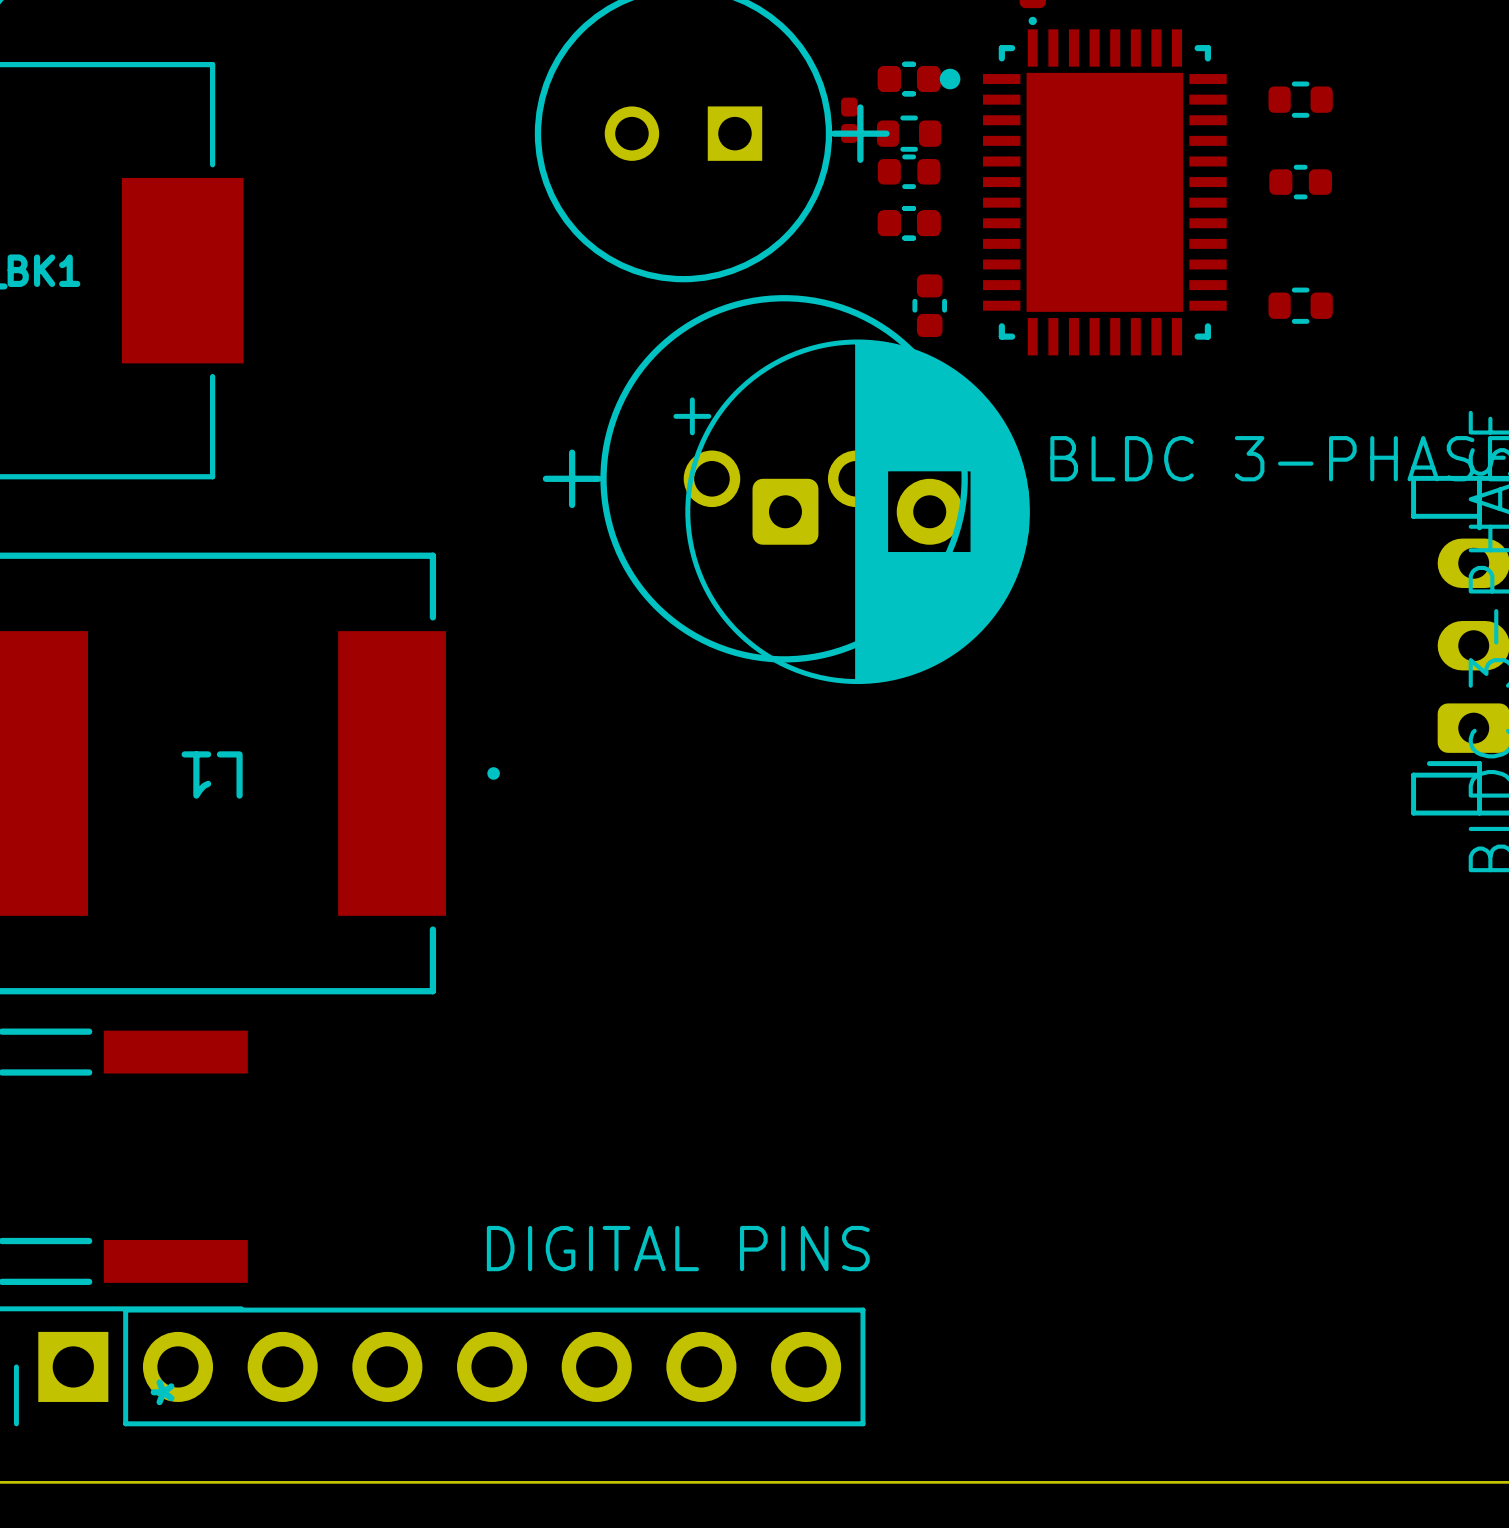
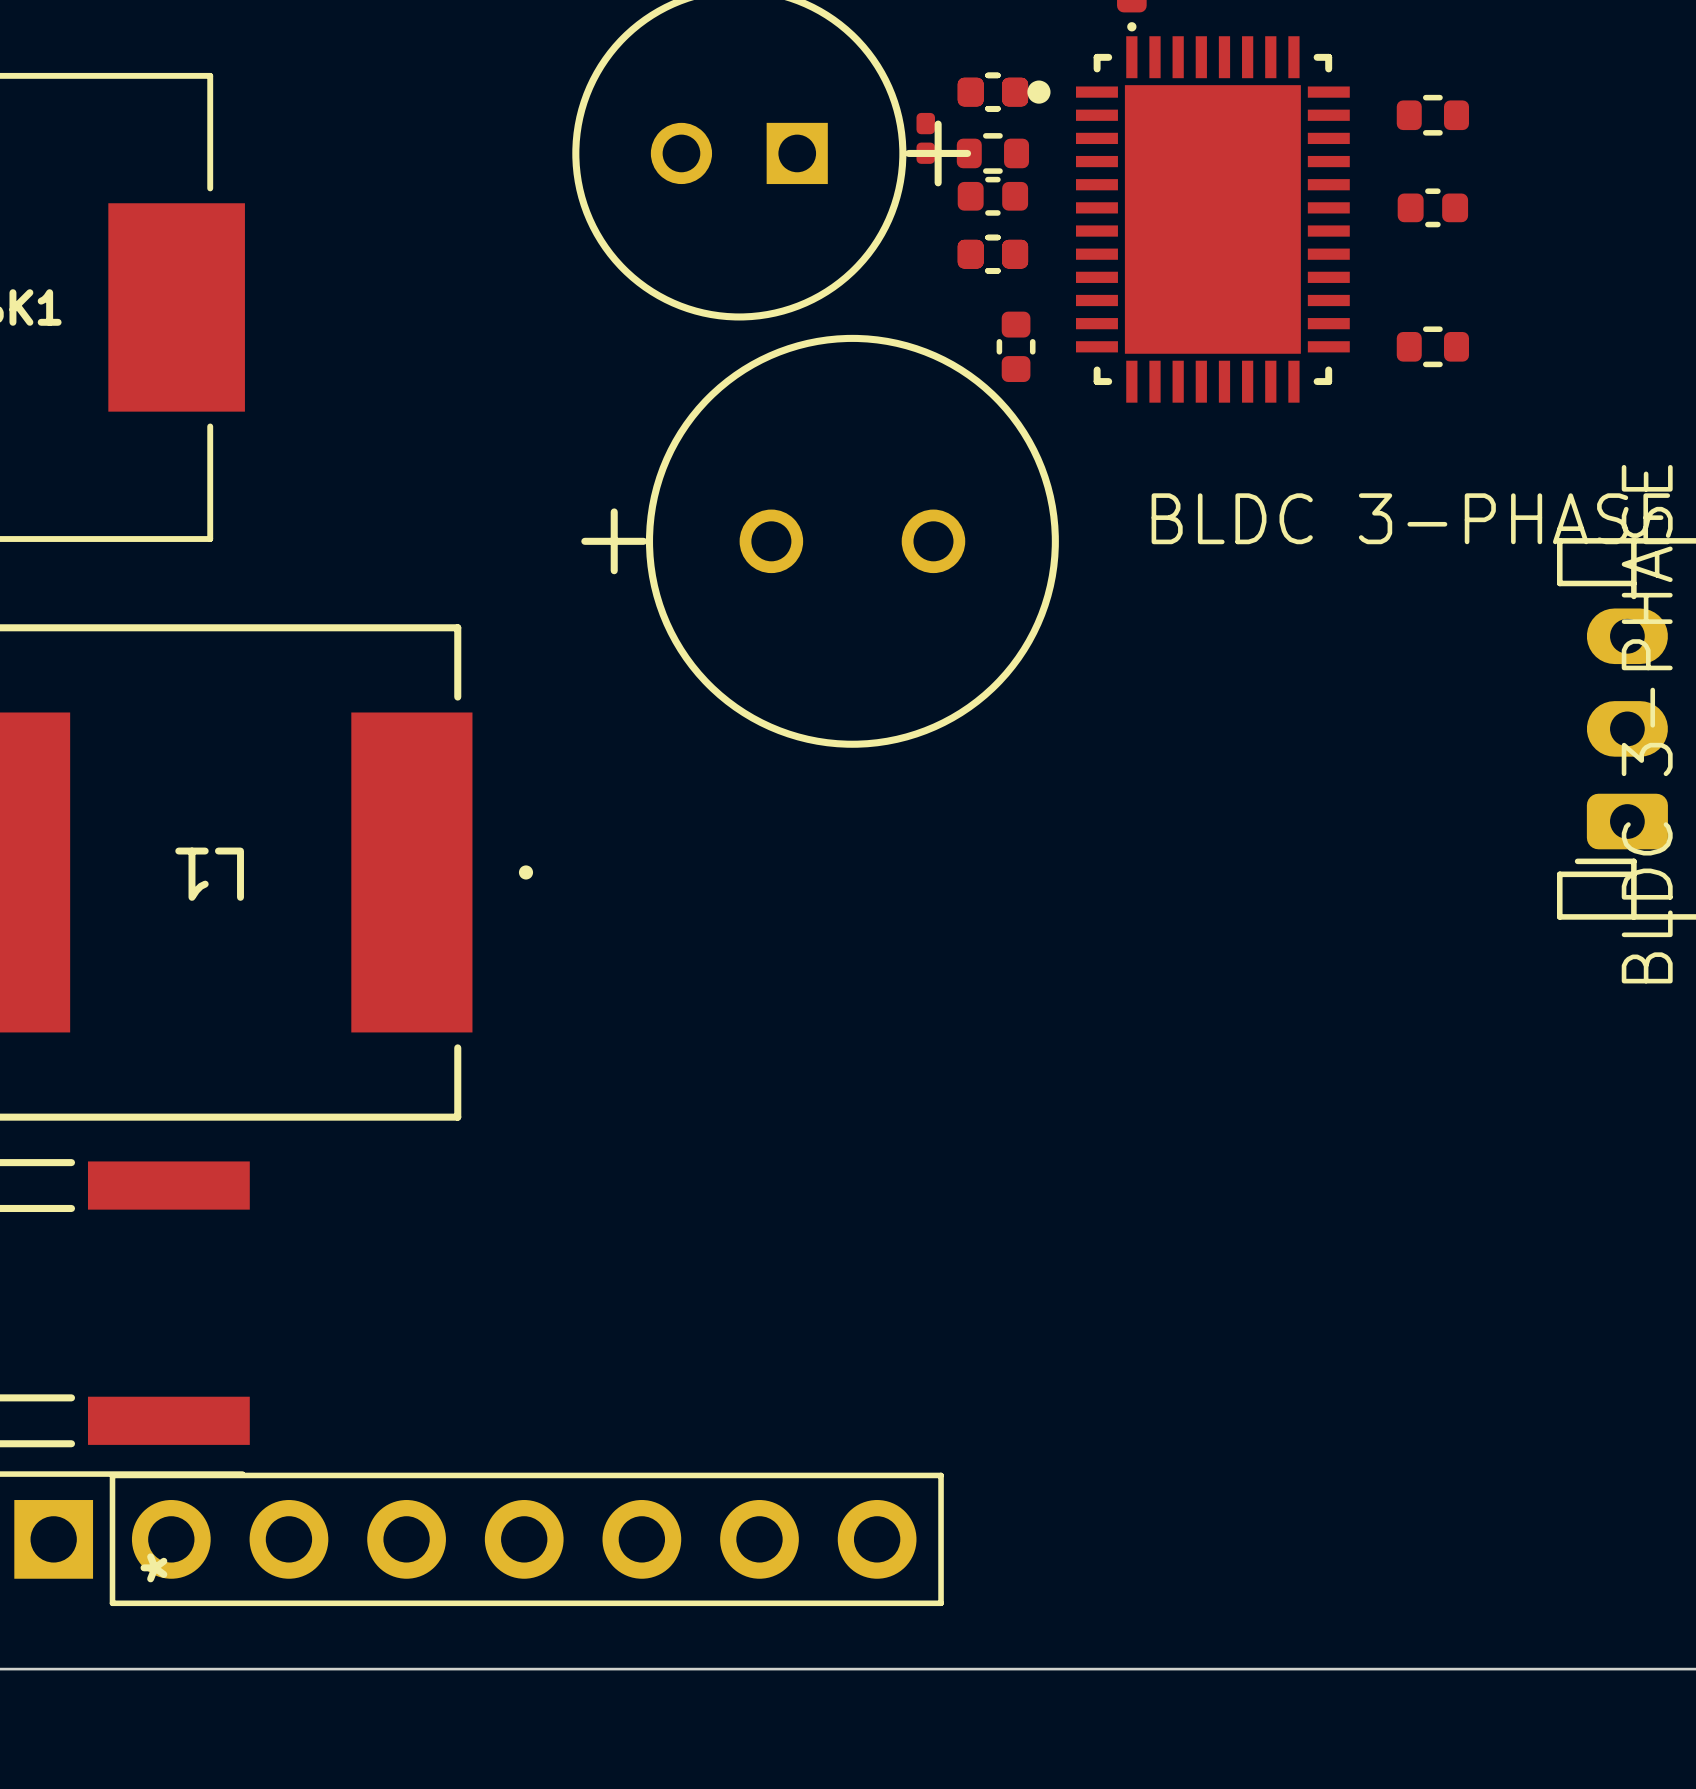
part: (851, 511) -> none
text: DIGITAL PINS (678, 1248) -> none

